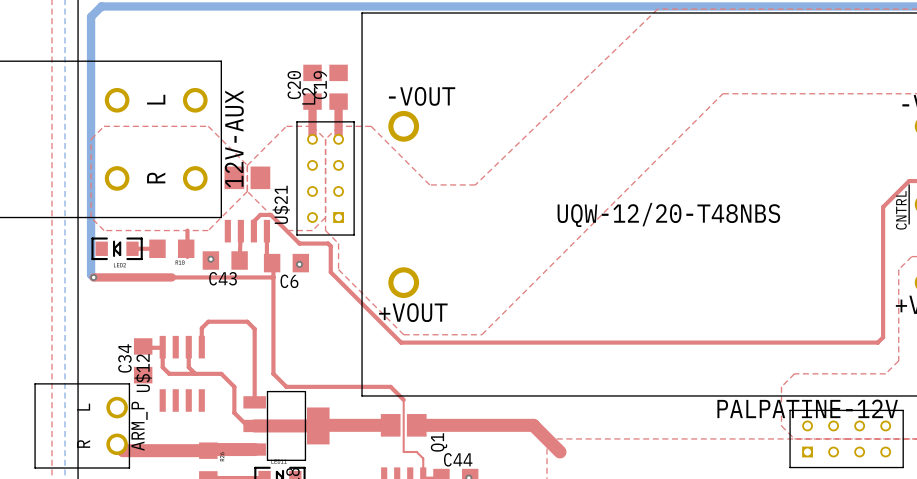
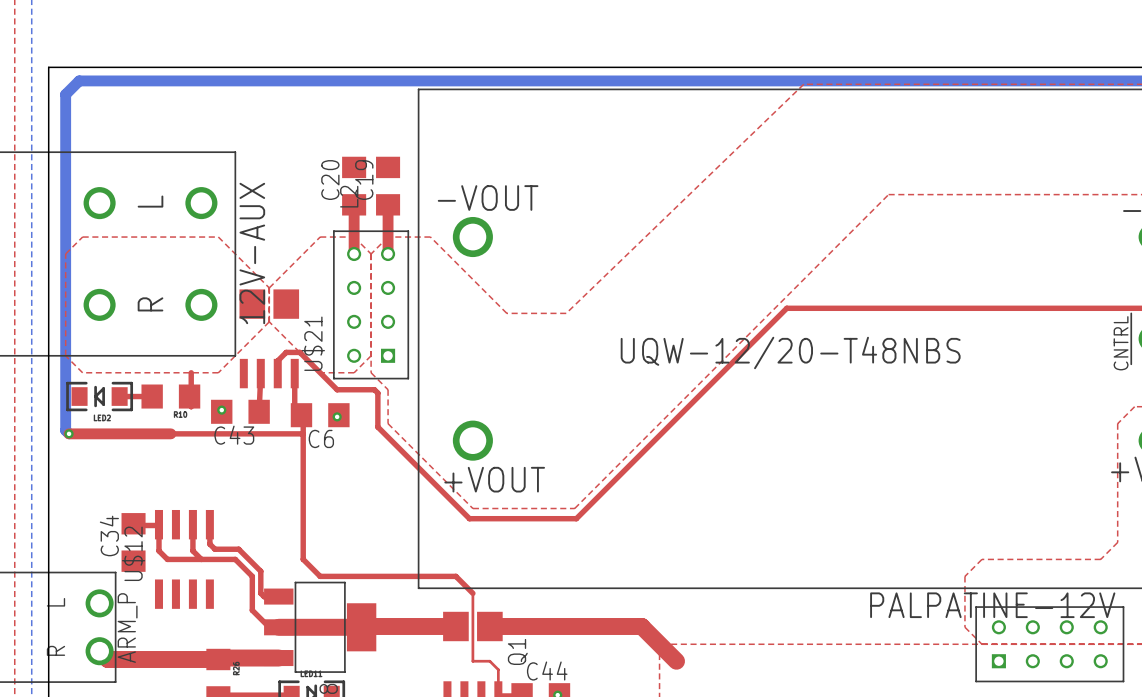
top track: (909, 181) (883, 207) (883, 337) (877, 342) (483, 342) -> (1131, 308) (786, 308) (576, 518)
top track: (201, 347) (201, 328) (208, 321) (247, 321) (254, 329) (254, 402) -> (209, 524) (209, 544) (214, 549) (238, 549) (260, 571) (260, 593) (264, 596) (278, 596)

